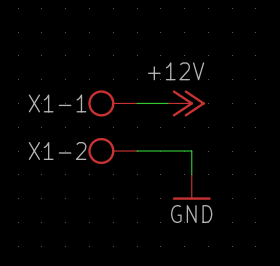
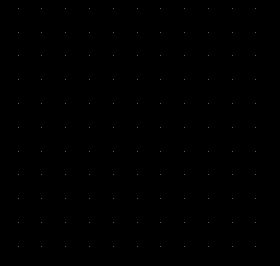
X1-1: (112, 103) -> none
wire: (137, 103) (167, 103) -> none
power symbol: +12V (186, 103) -> none
X1-2: (112, 151) -> none
wire: (137, 151) (191, 151) (191, 174) -> none
power symbol: GND (191, 187) -> none

